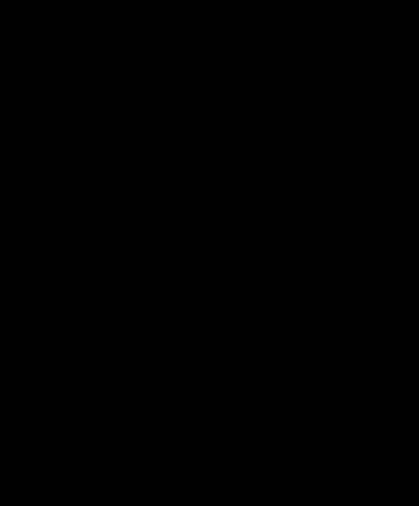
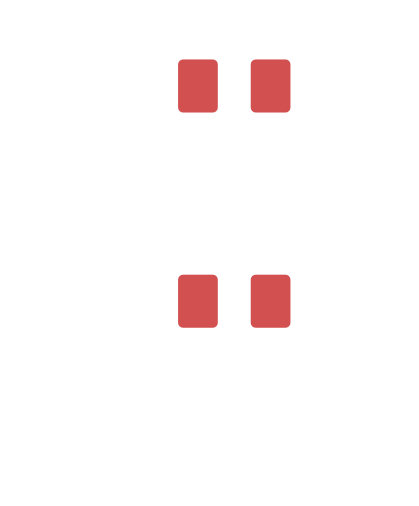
part: none -> (234, 85)
part: none -> (234, 301)

